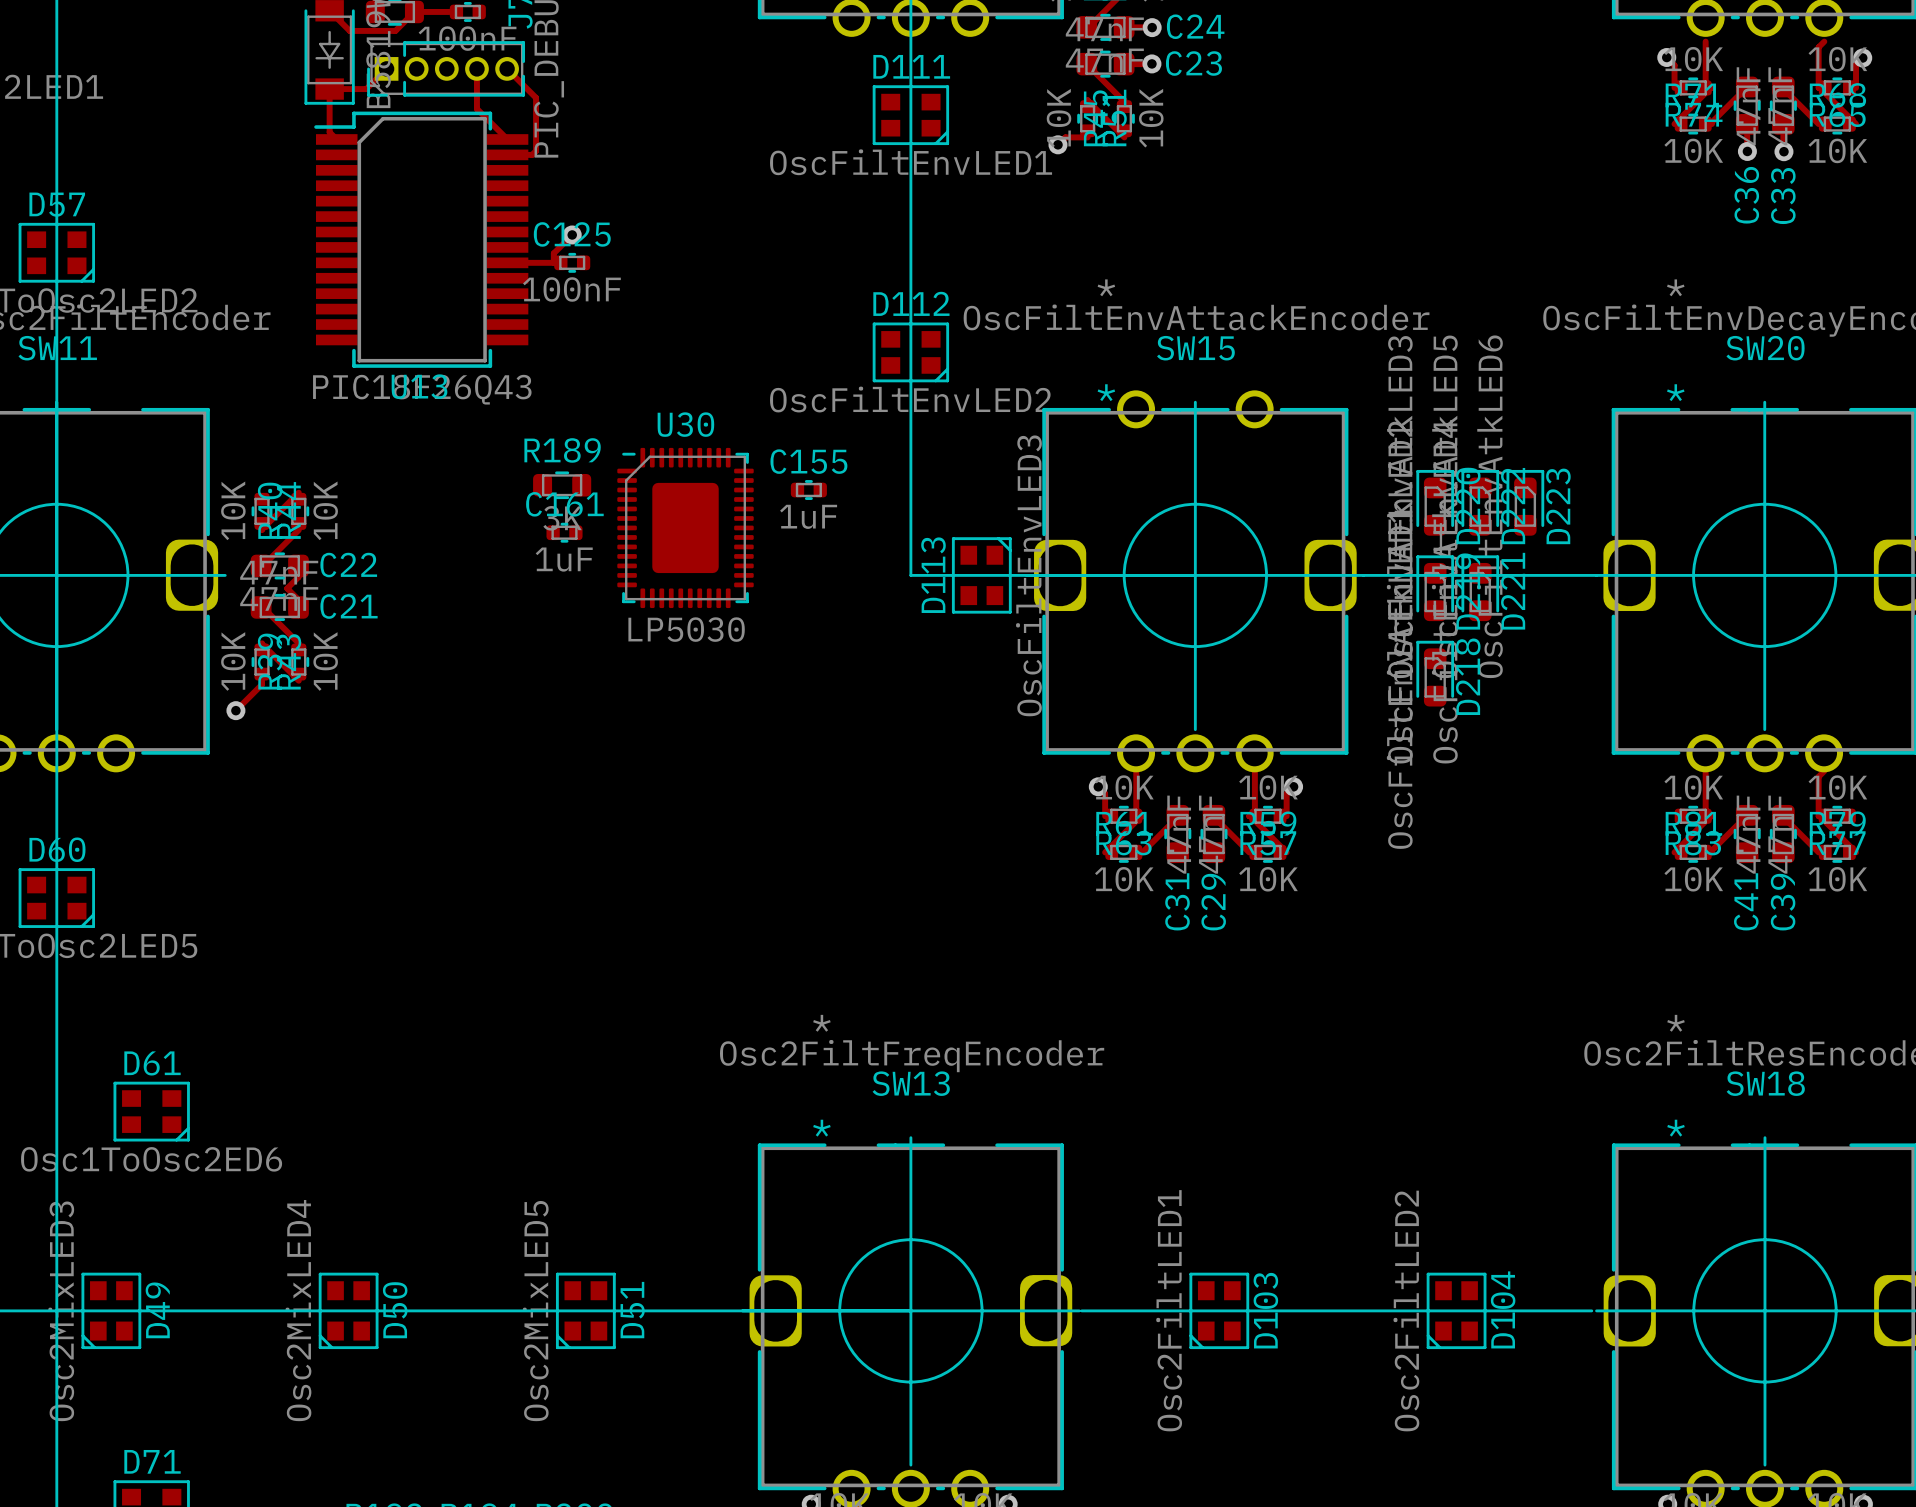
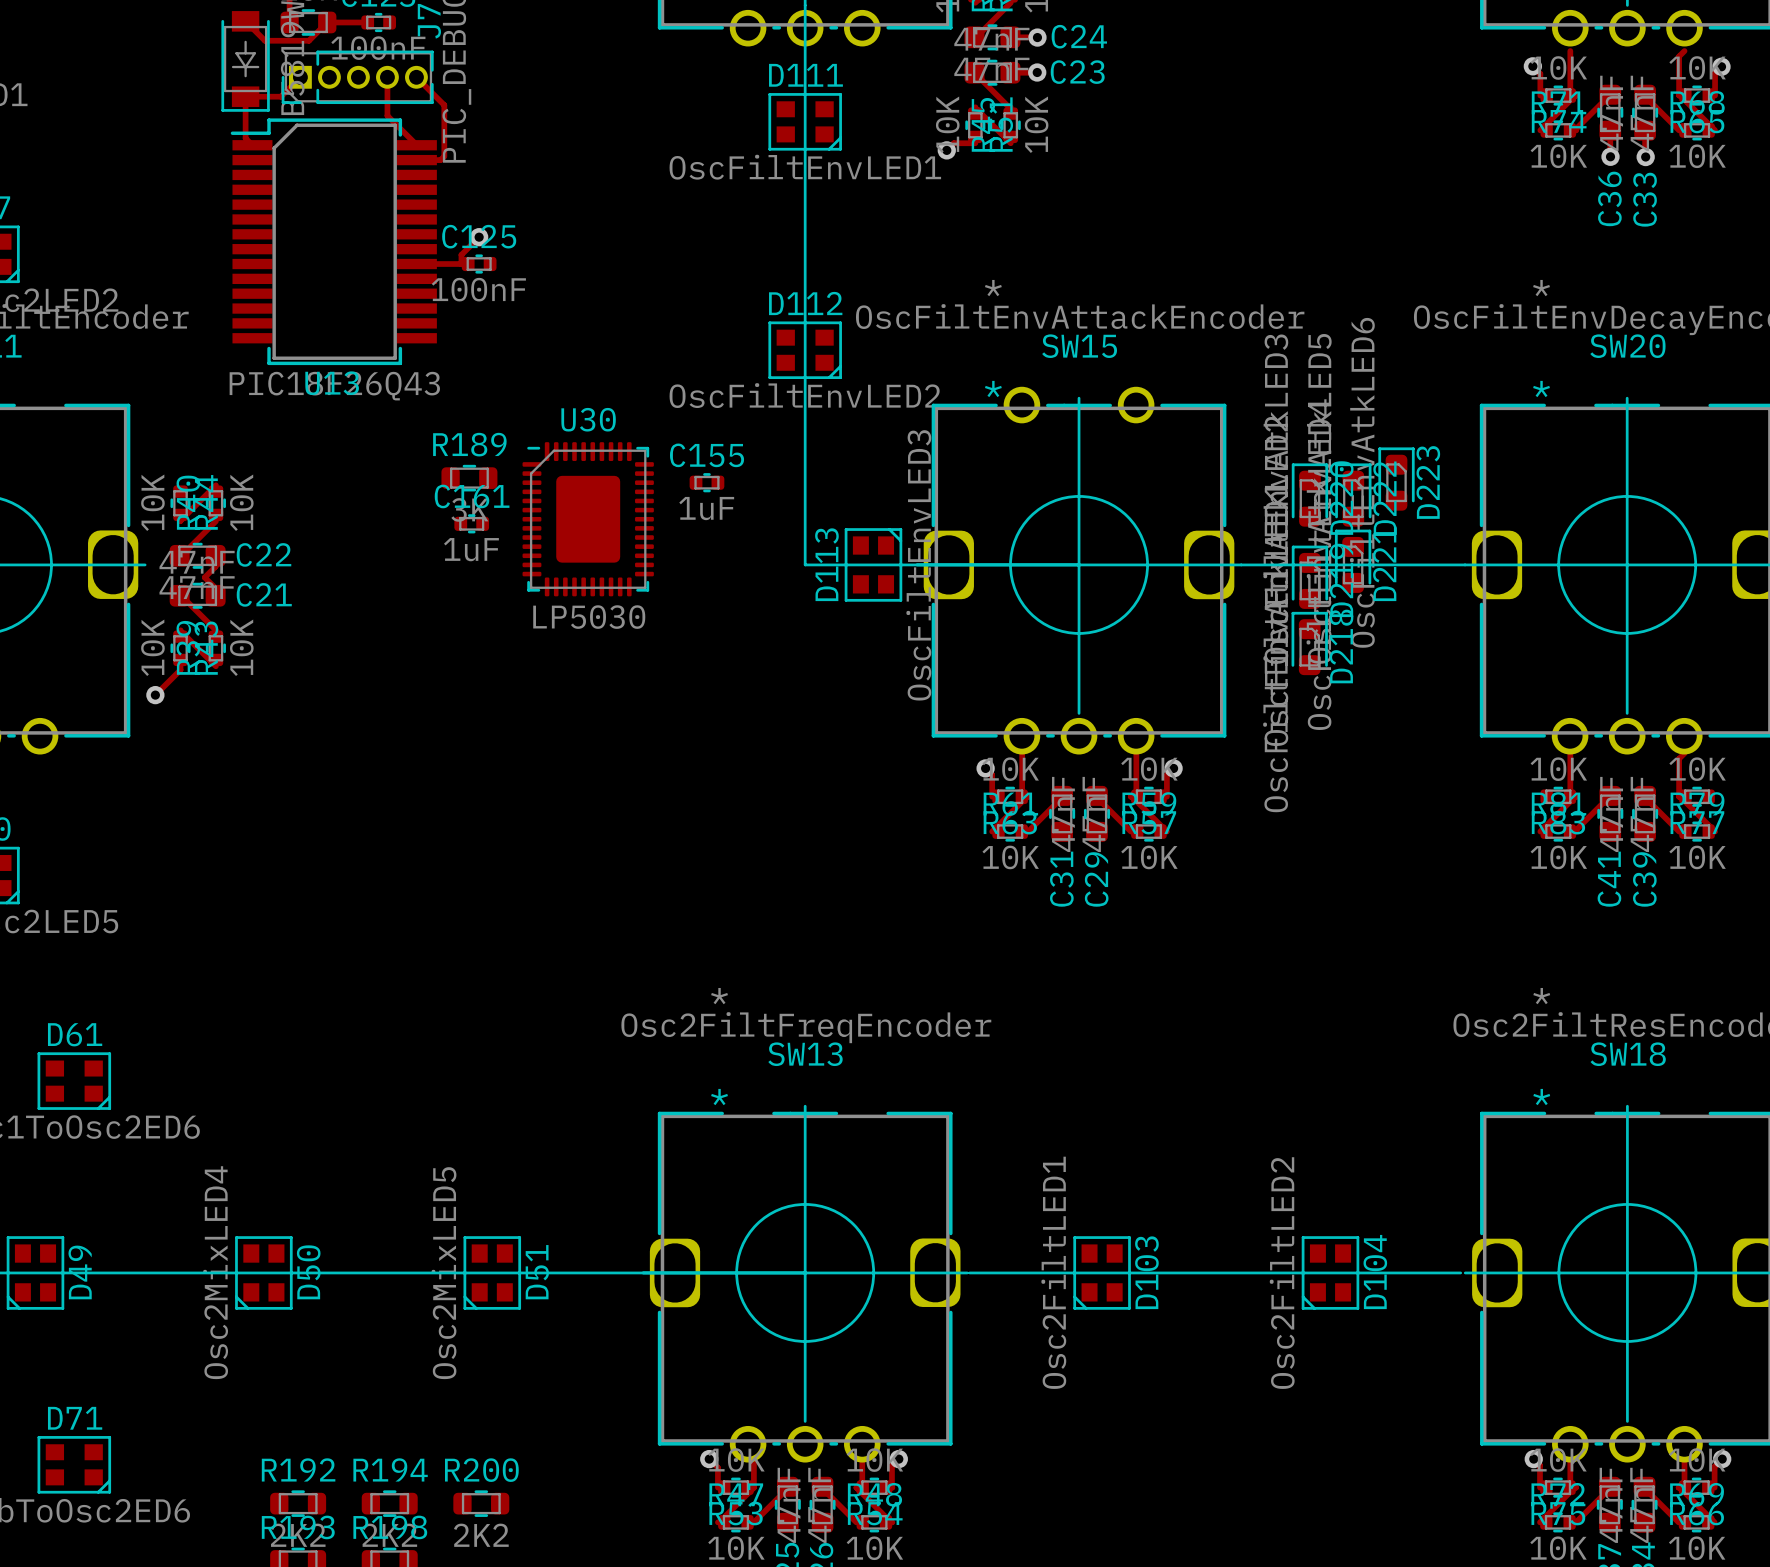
D223 position: (1525, 502) -> (1396, 479)
D221 position: (1480, 588) -> (1353, 561)
D218 position: (1435, 673) -> (1309, 643)

